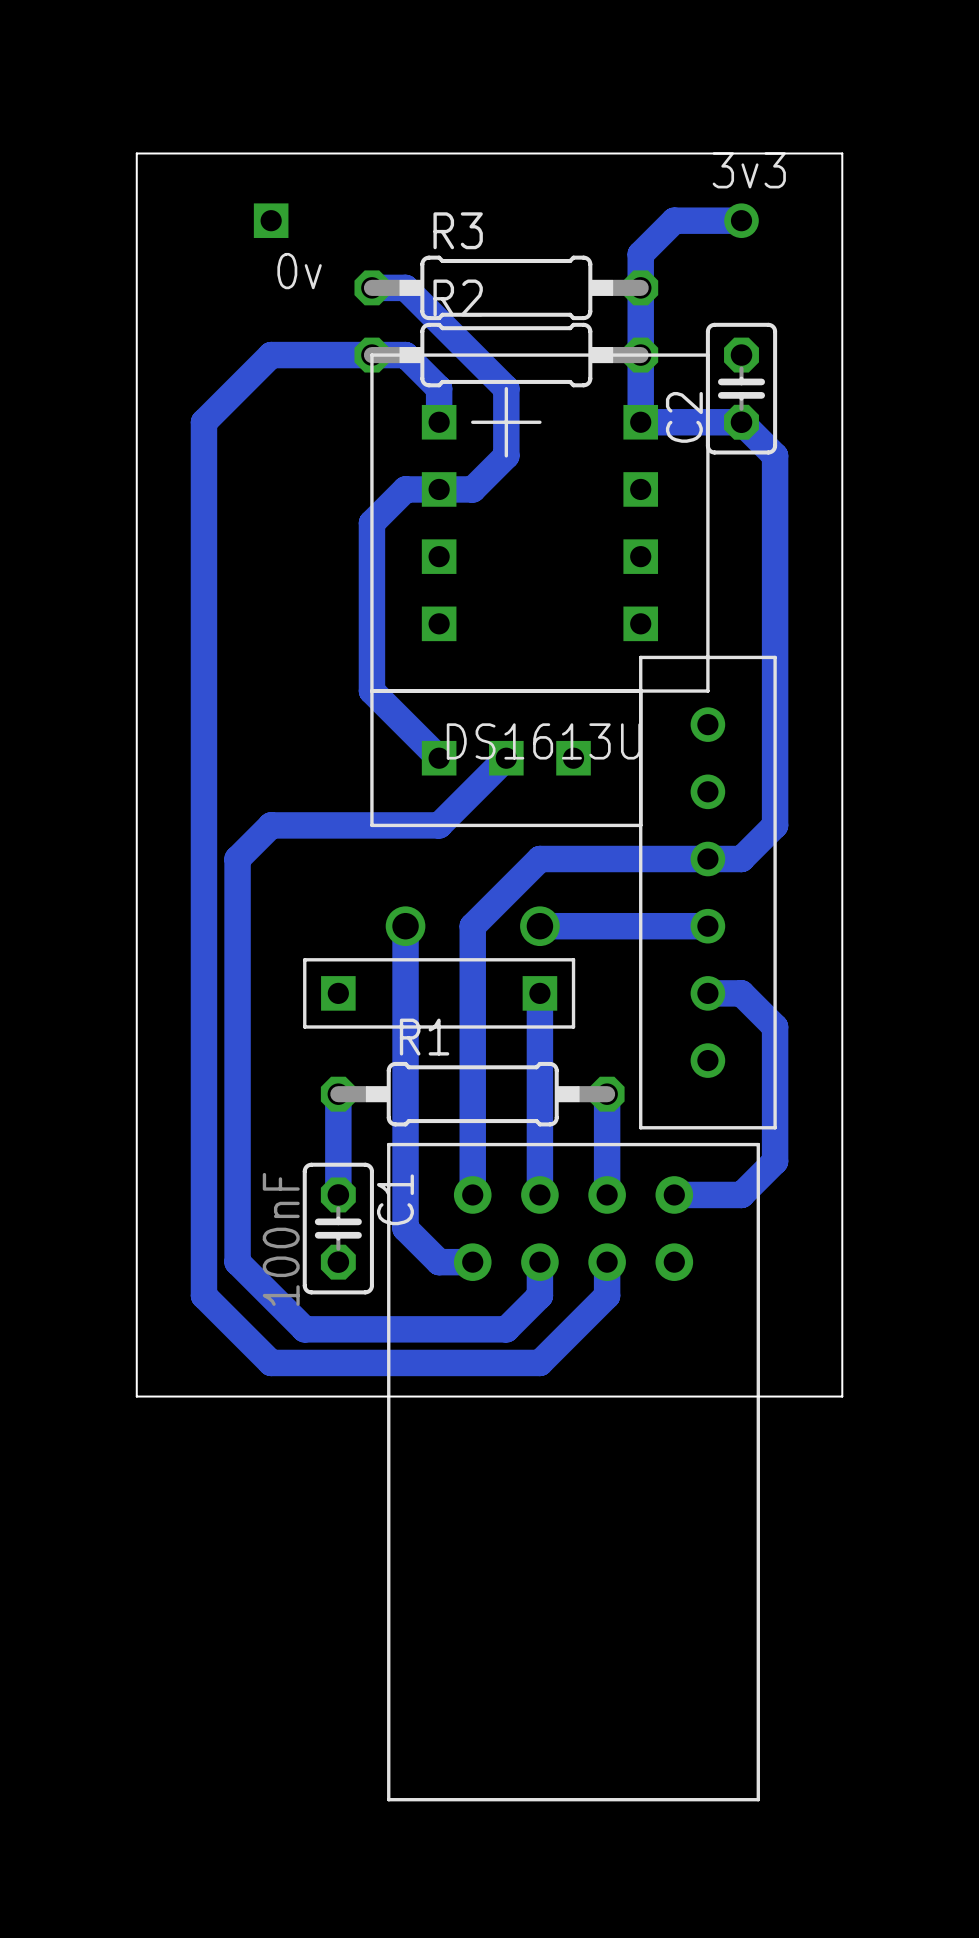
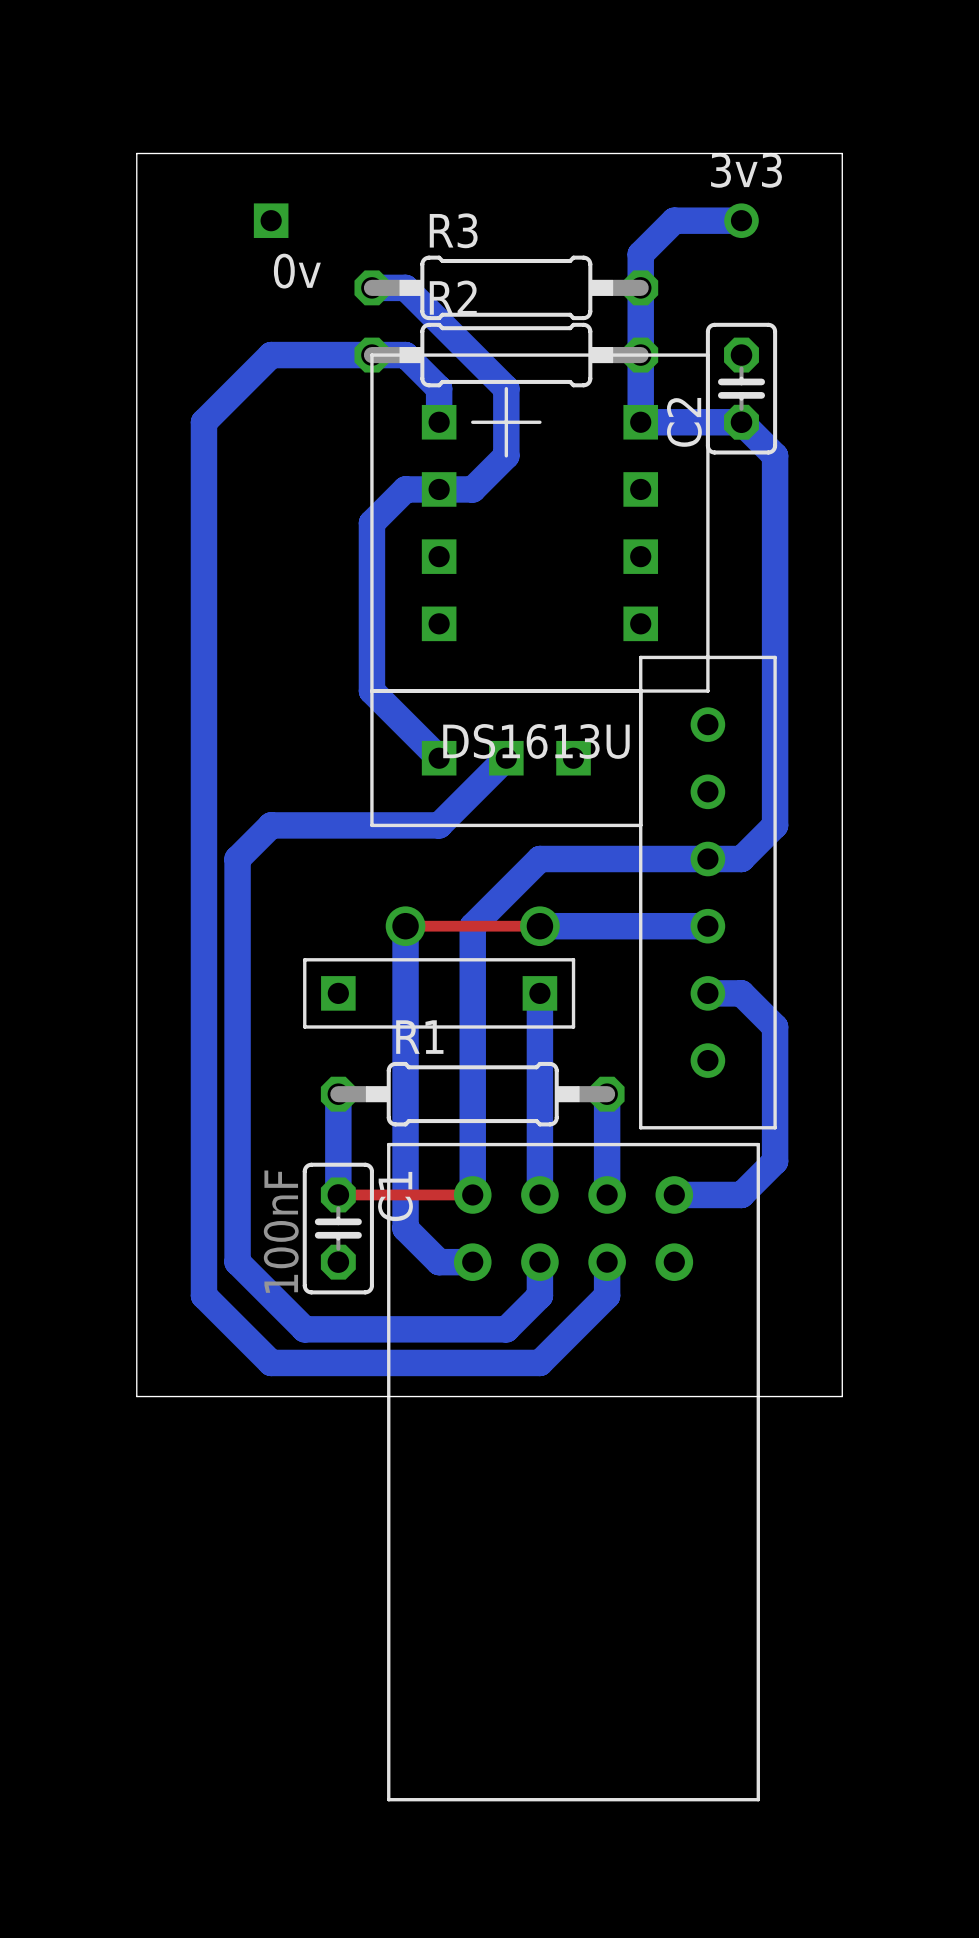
top track: none -> (405, 926) (539, 926)
top track: none -> (338, 1194) (472, 1194)

